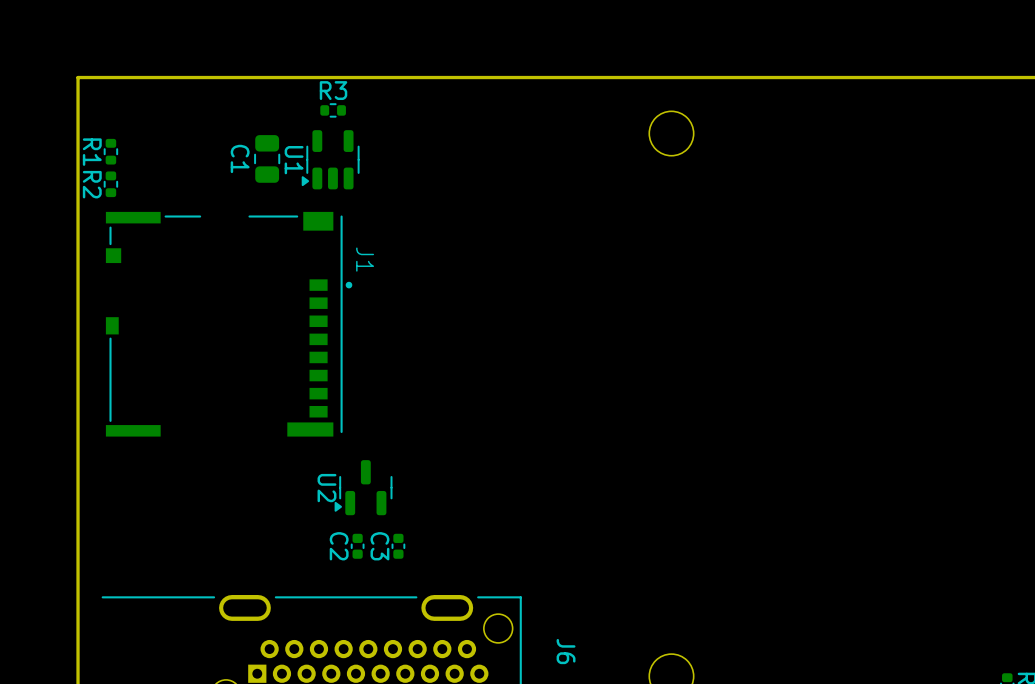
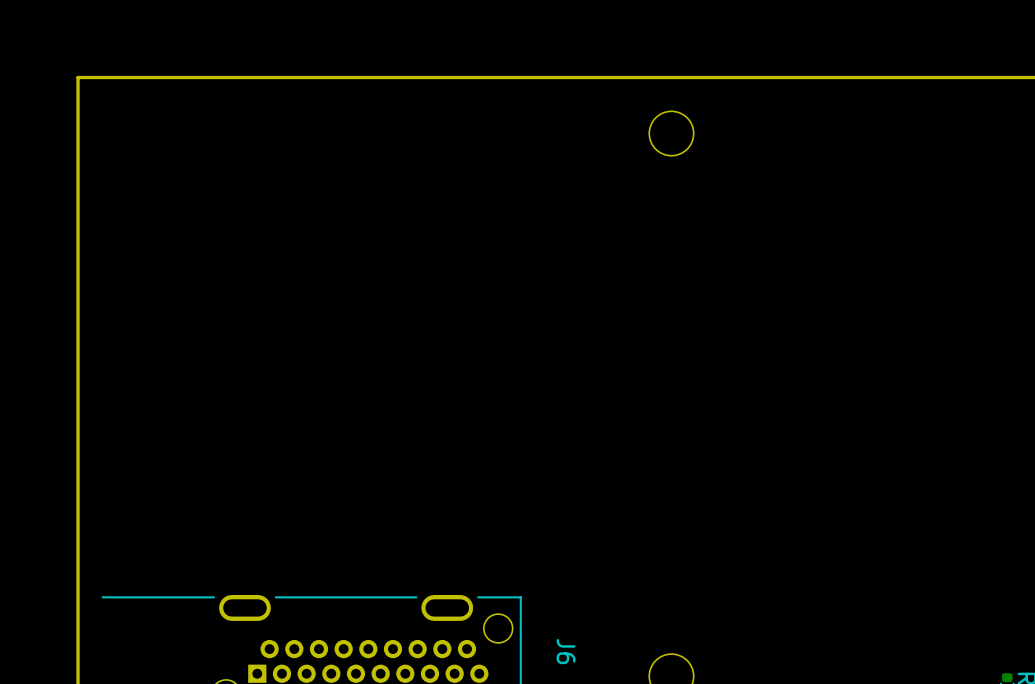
R3: (333, 110) -> none
R1: (110, 151) -> none
C1: (267, 158) -> none
U1: (330, 159) -> none
R2: (110, 184) -> none
J1: (229, 324) -> none
U2: (363, 487) -> none
C2: (357, 546) -> none
C3: (398, 546) -> none

